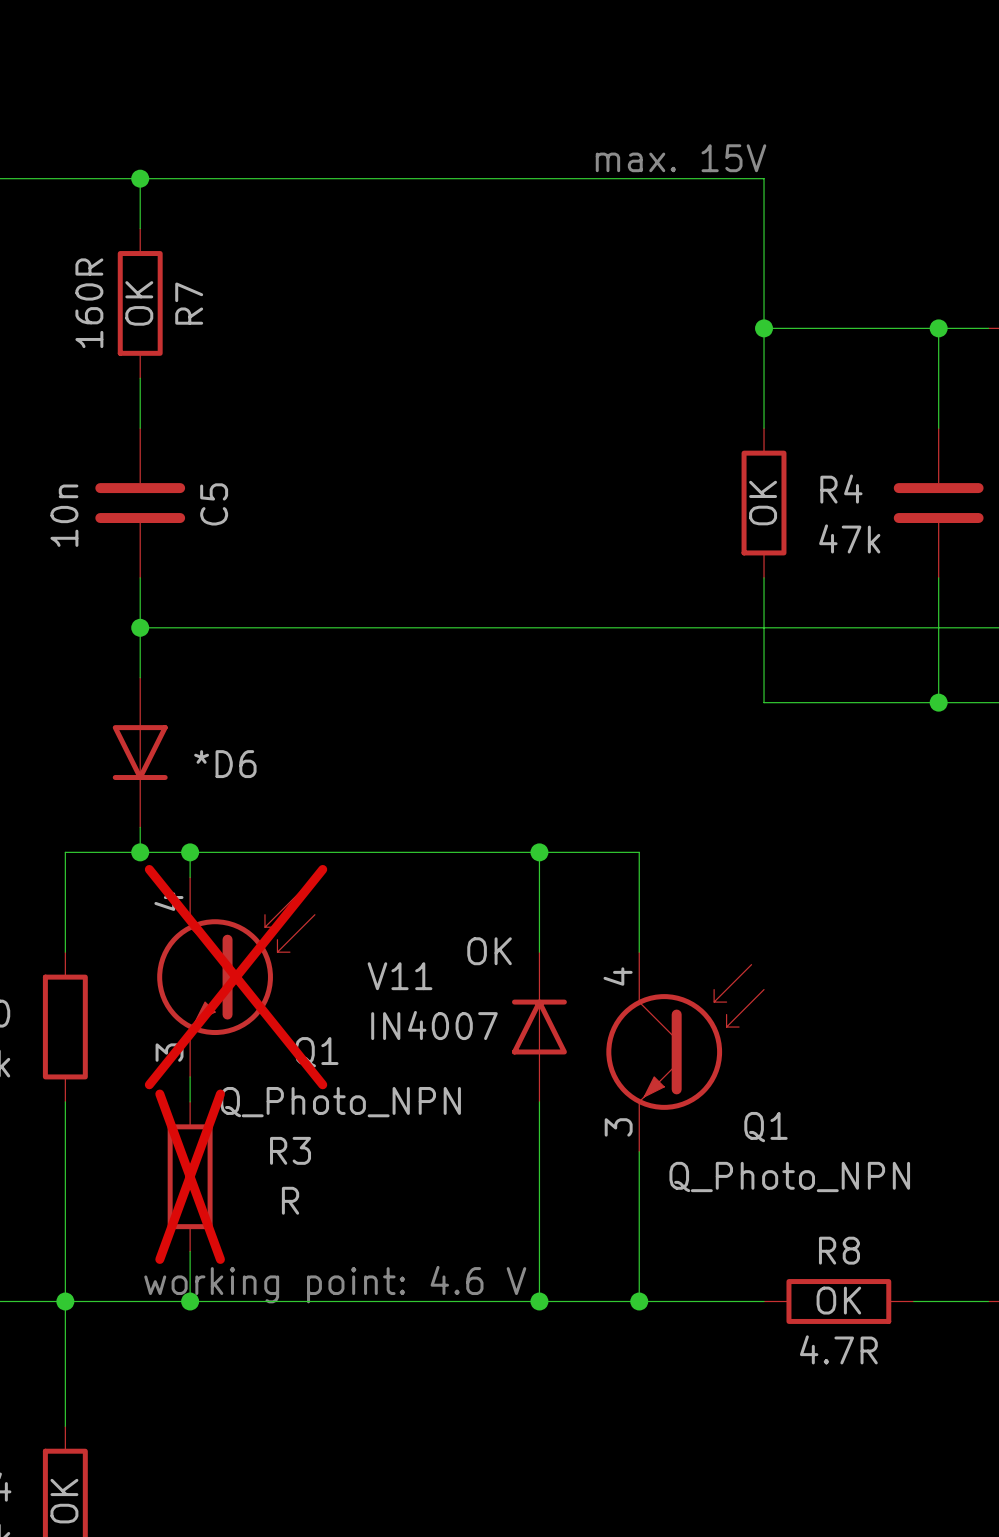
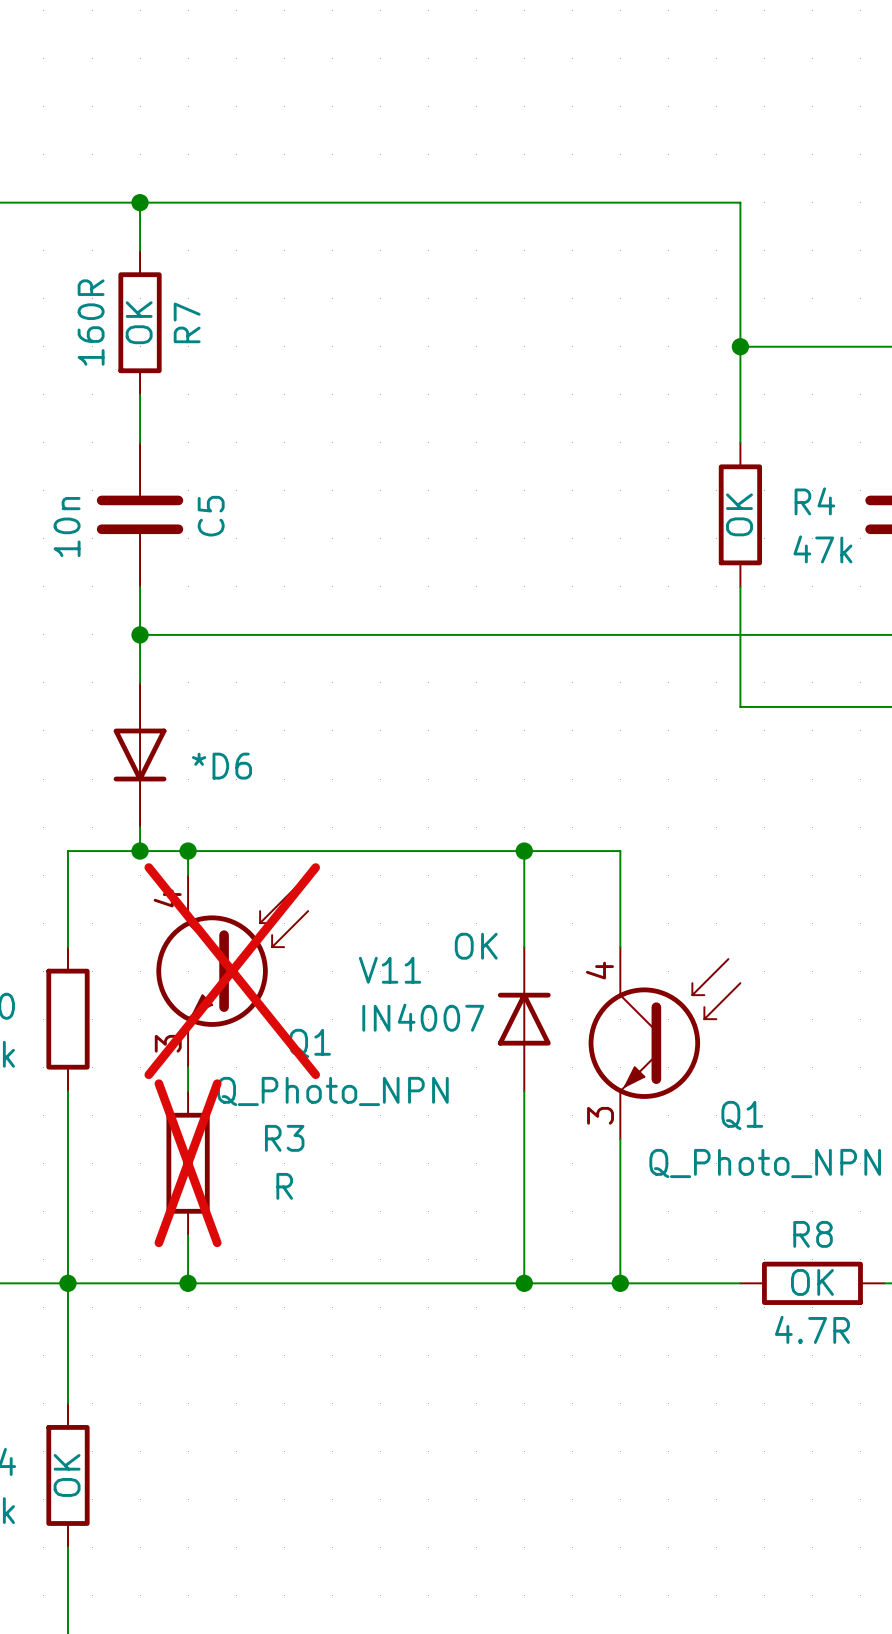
text: max. 15V (681, 158) -> none
text: working point: 4.6 V (335, 1284) -> none

